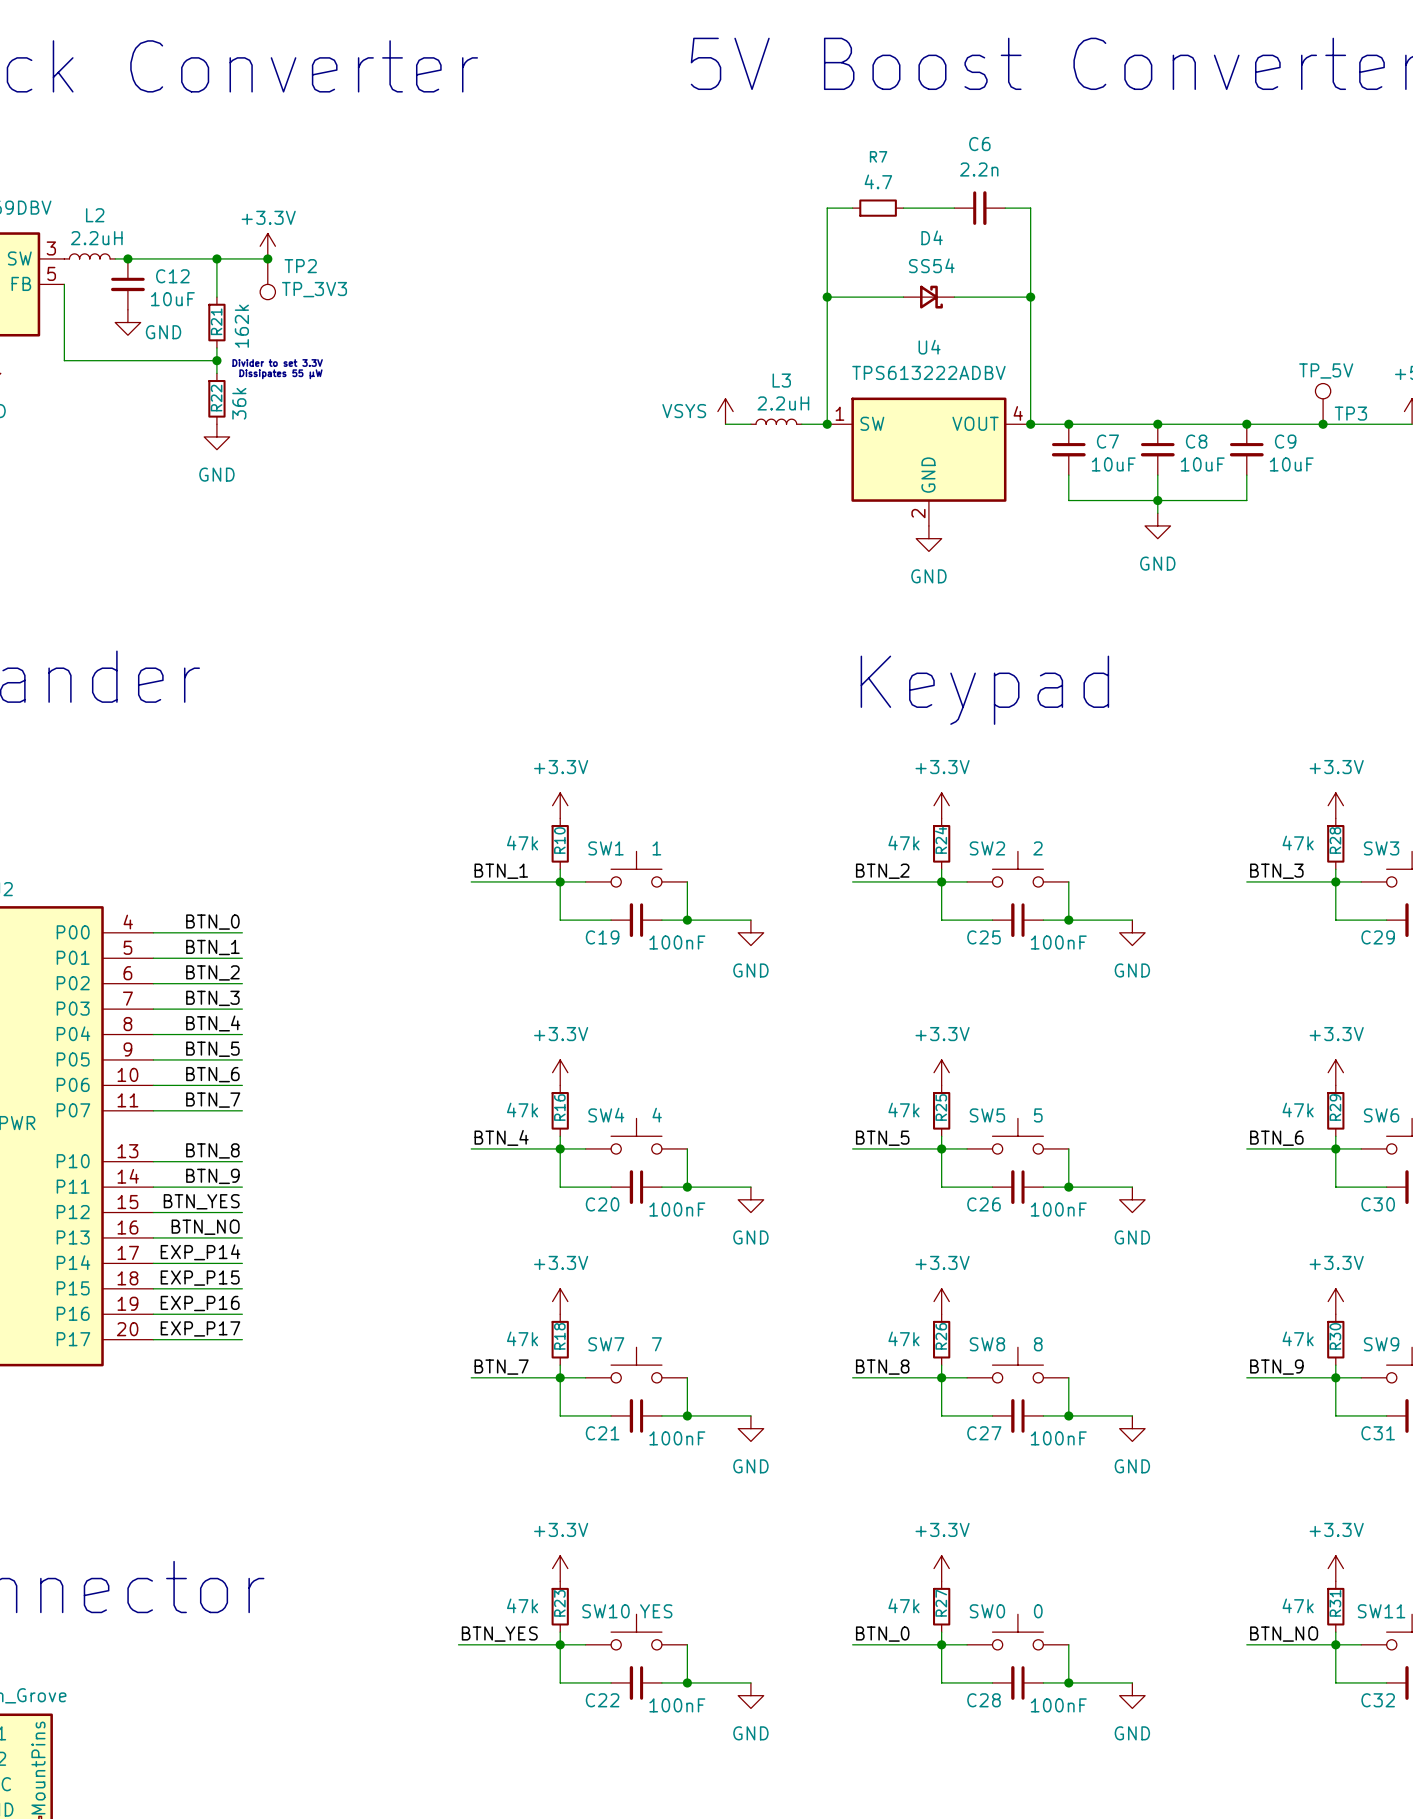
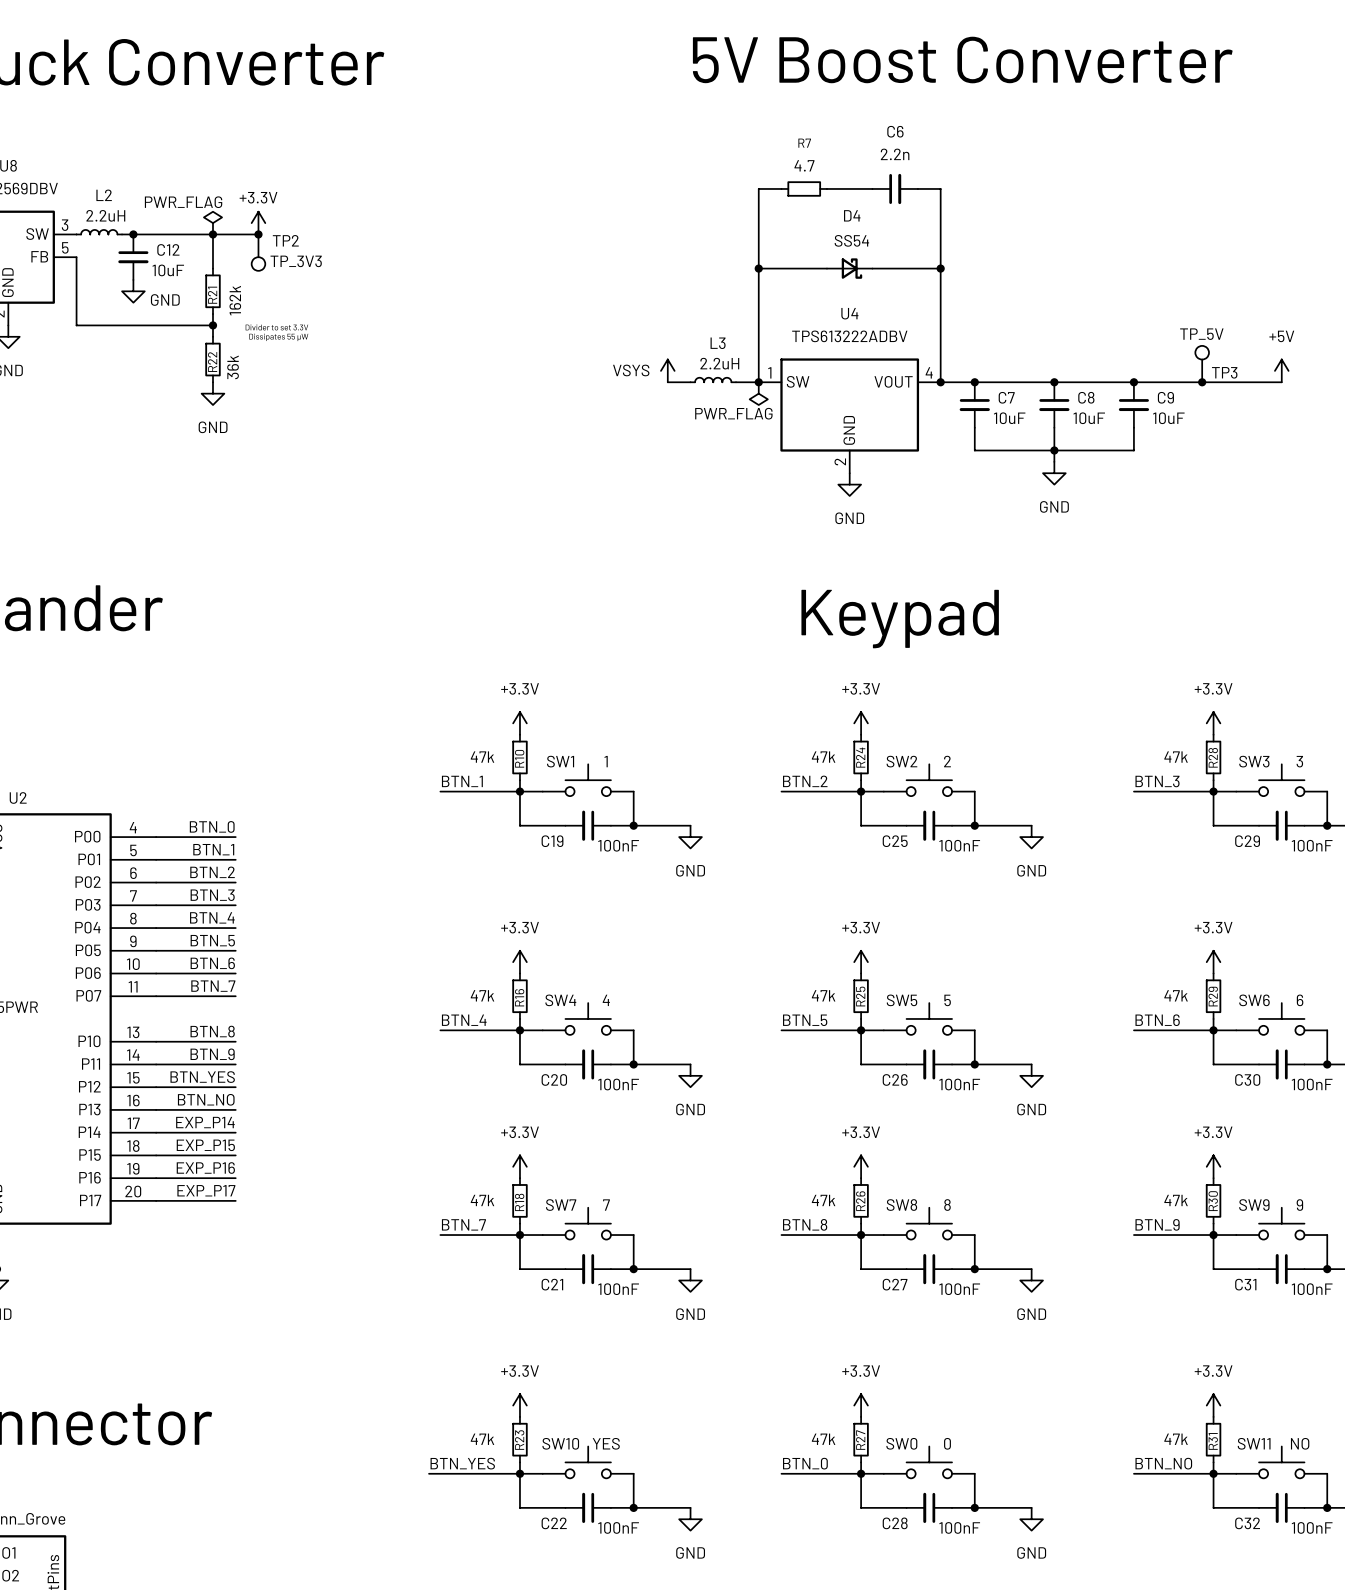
power symbol: none -> PWR_FLAG (212, 223)
power symbol: none -> PWR_FLAG (758, 393)

